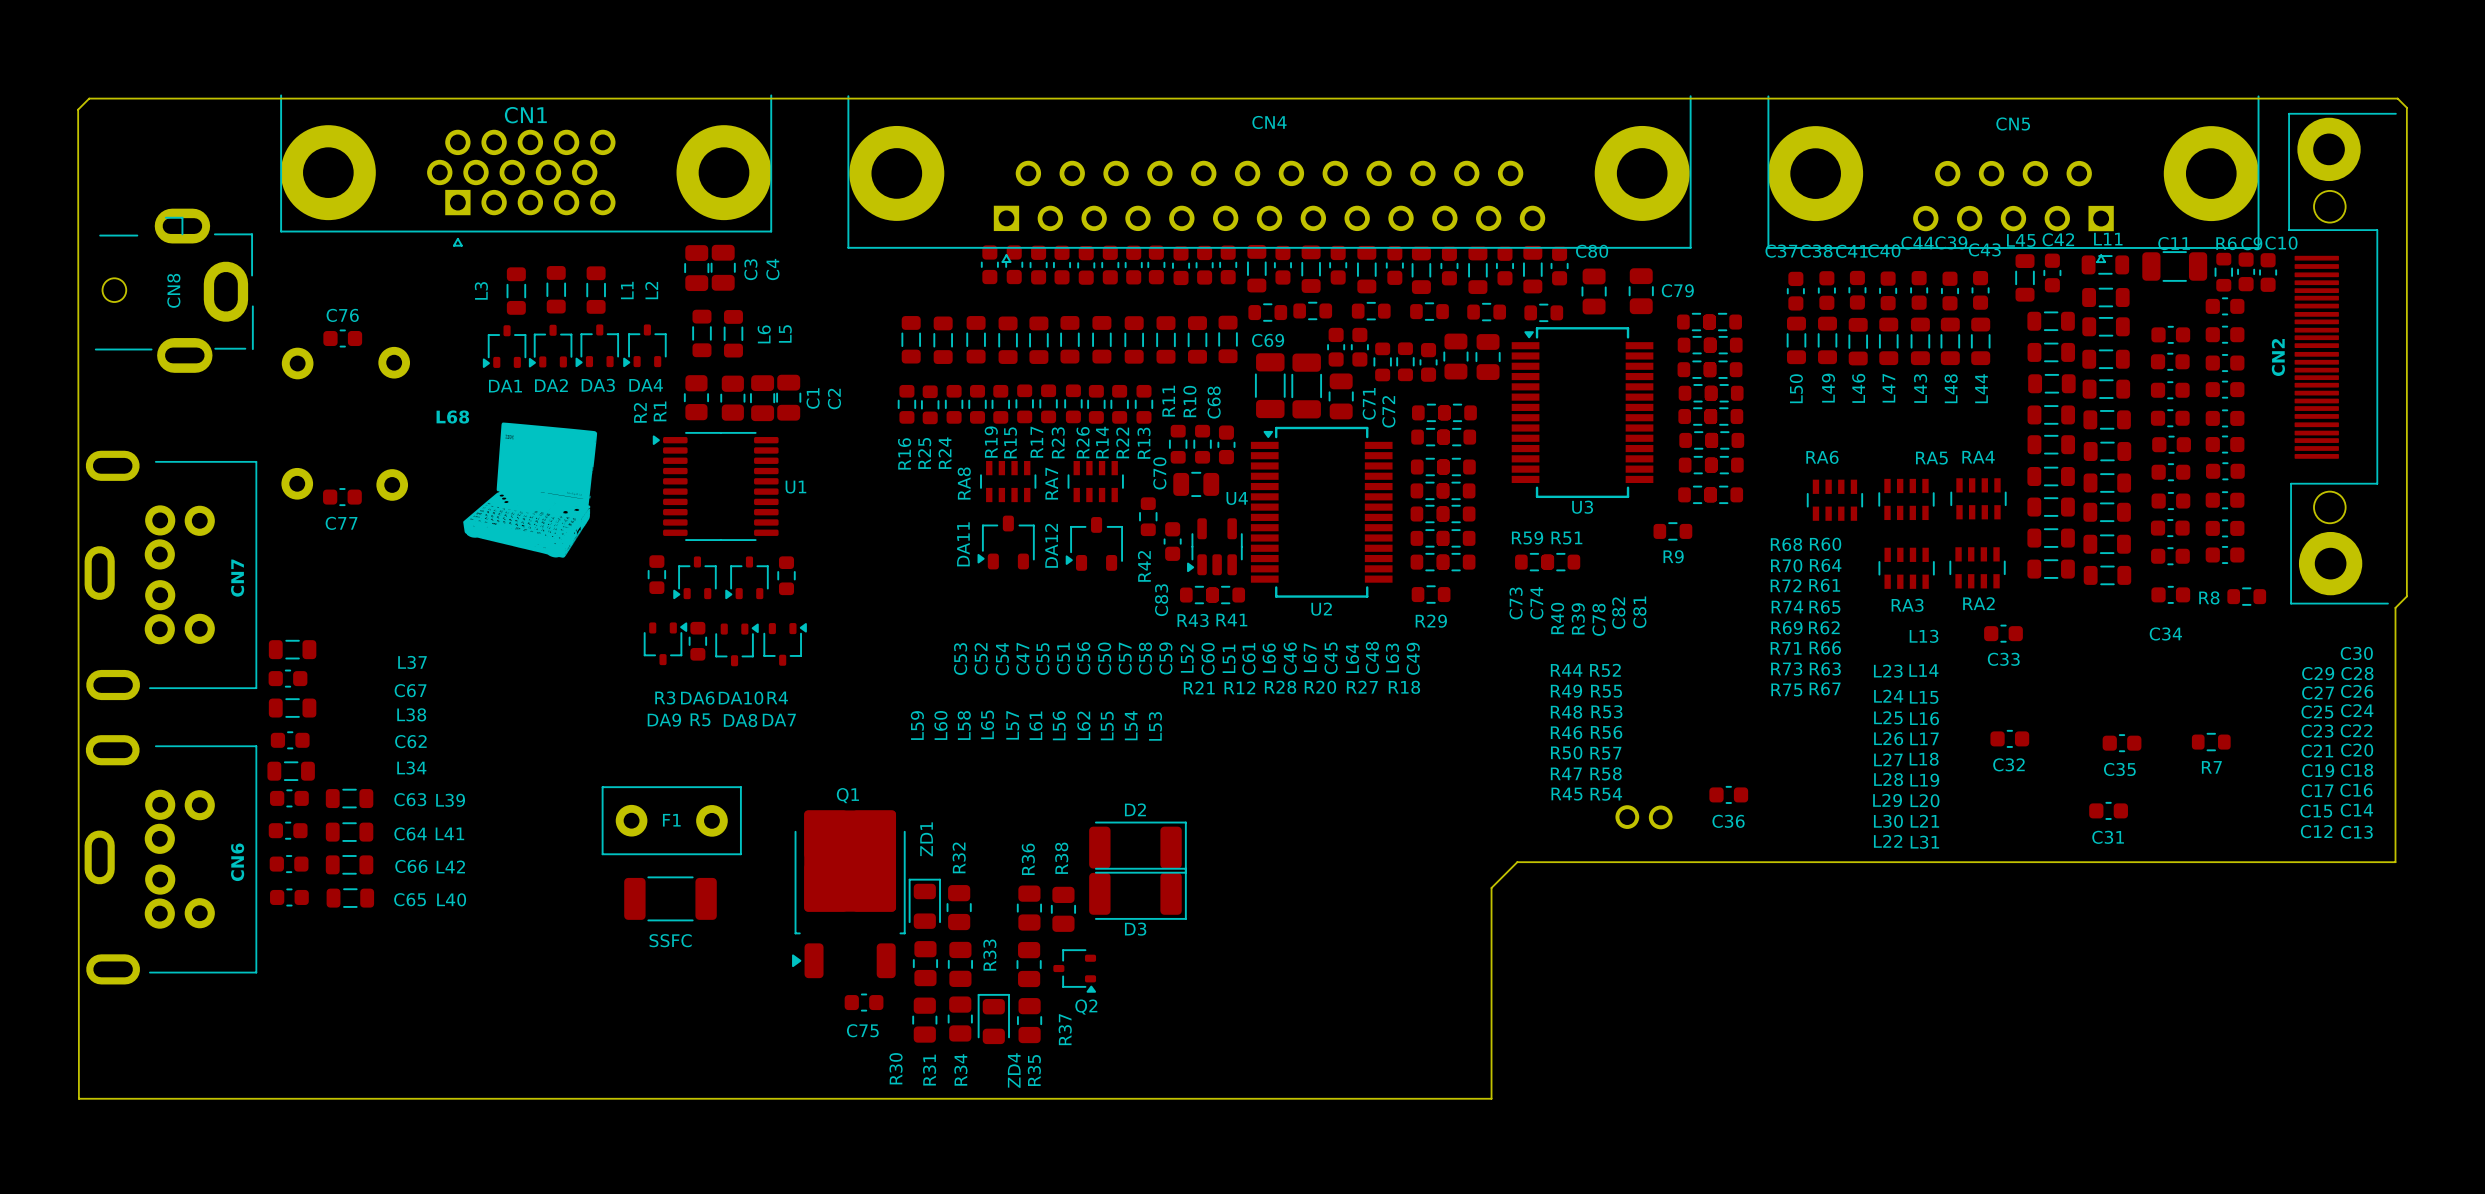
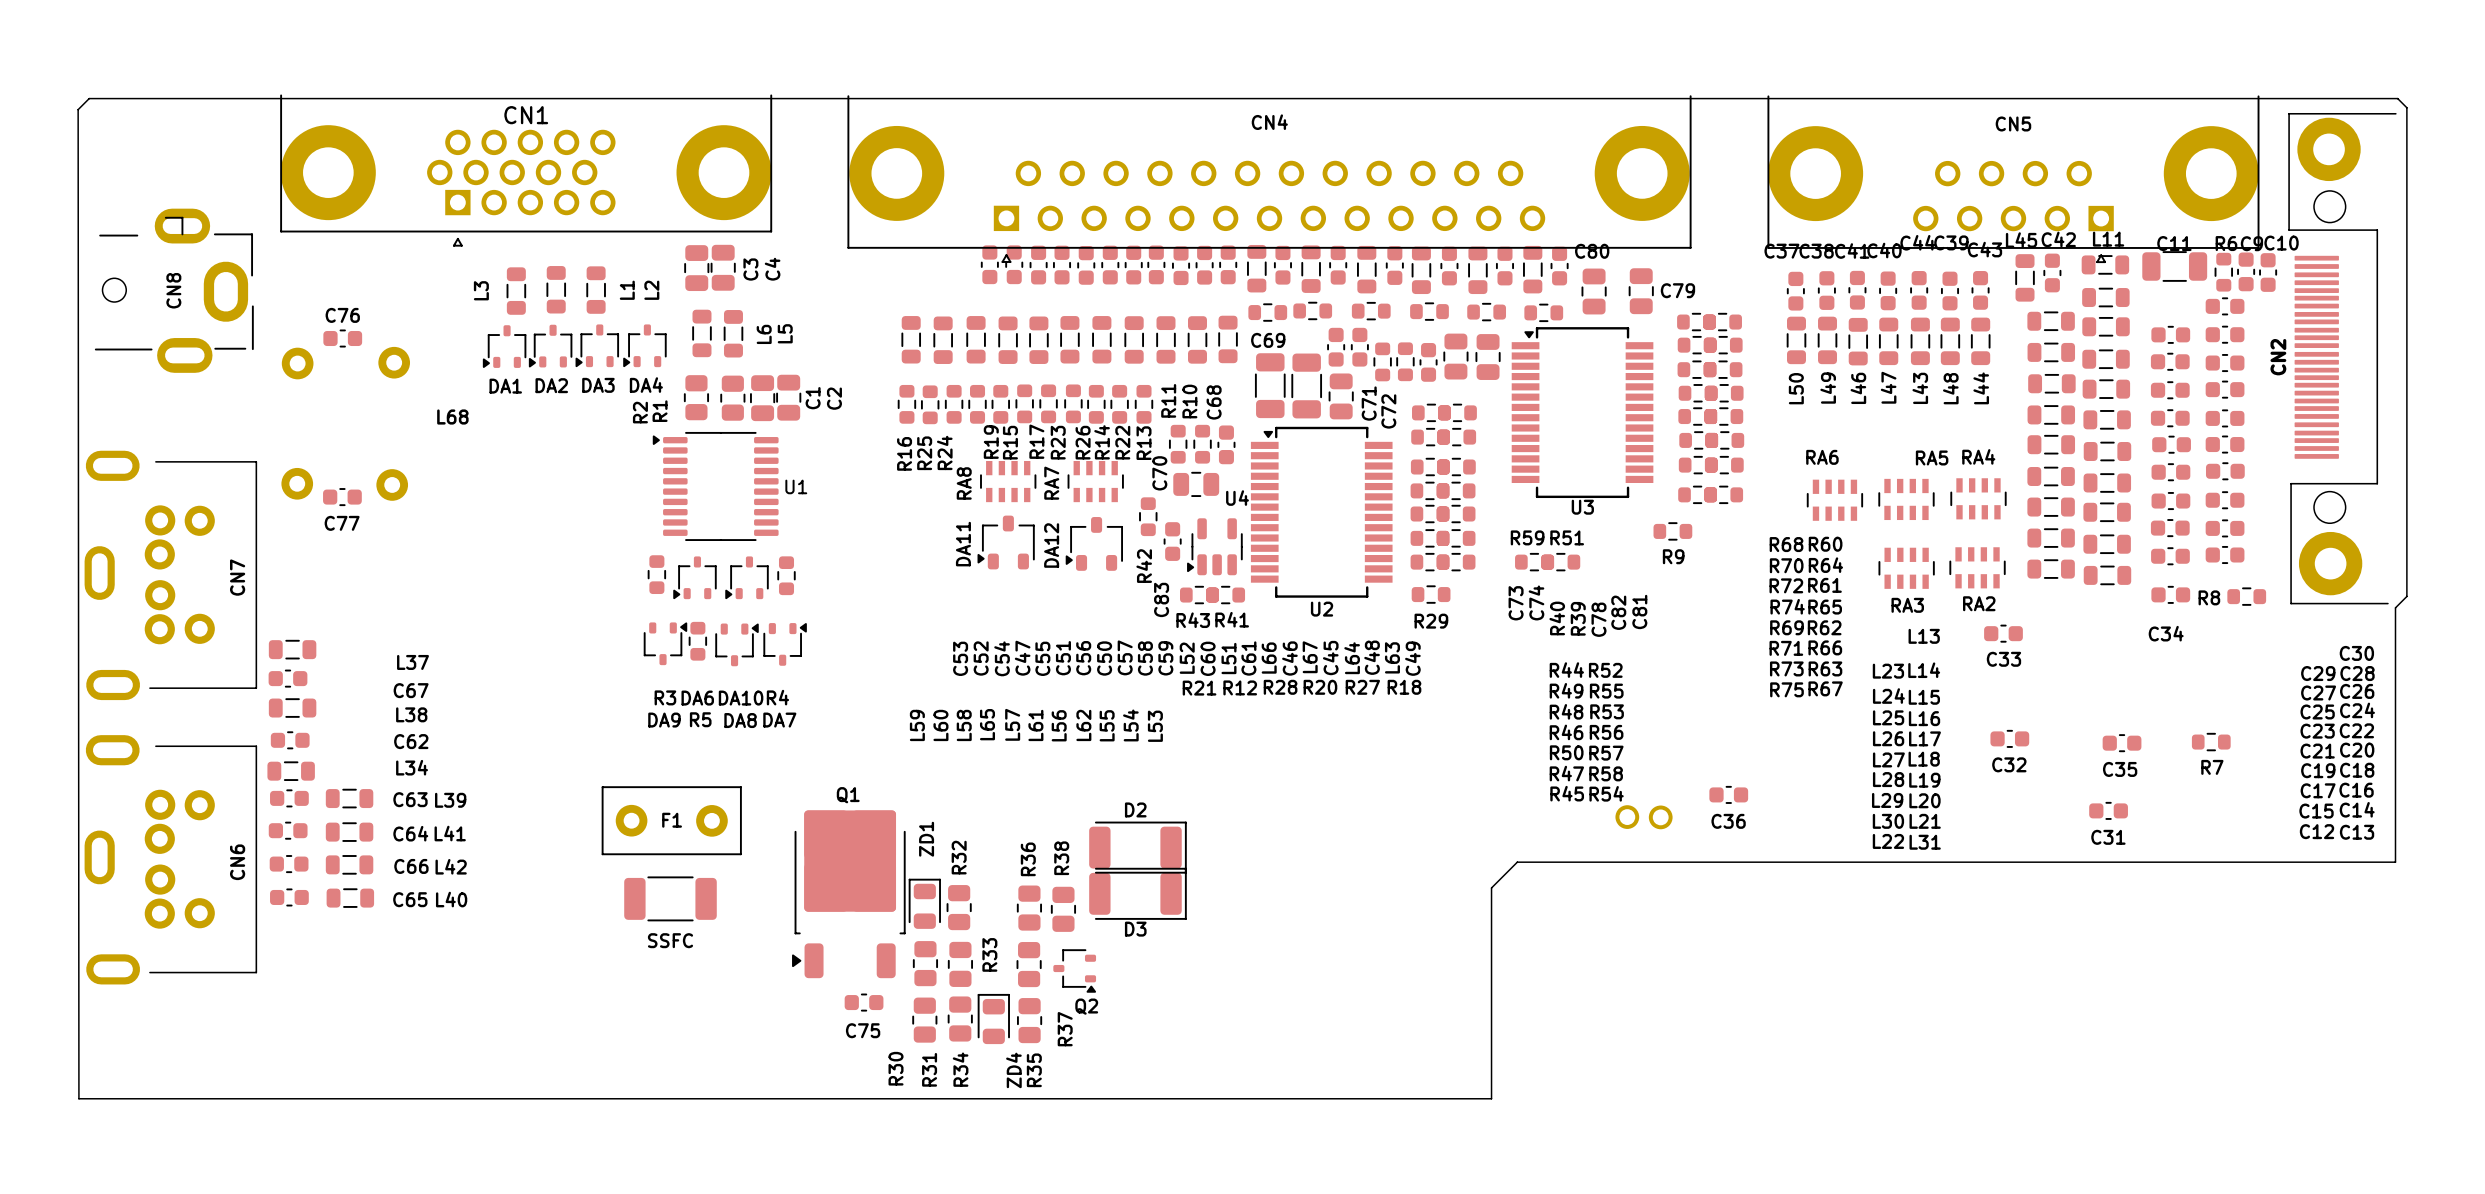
part: (530, 490) -> none

